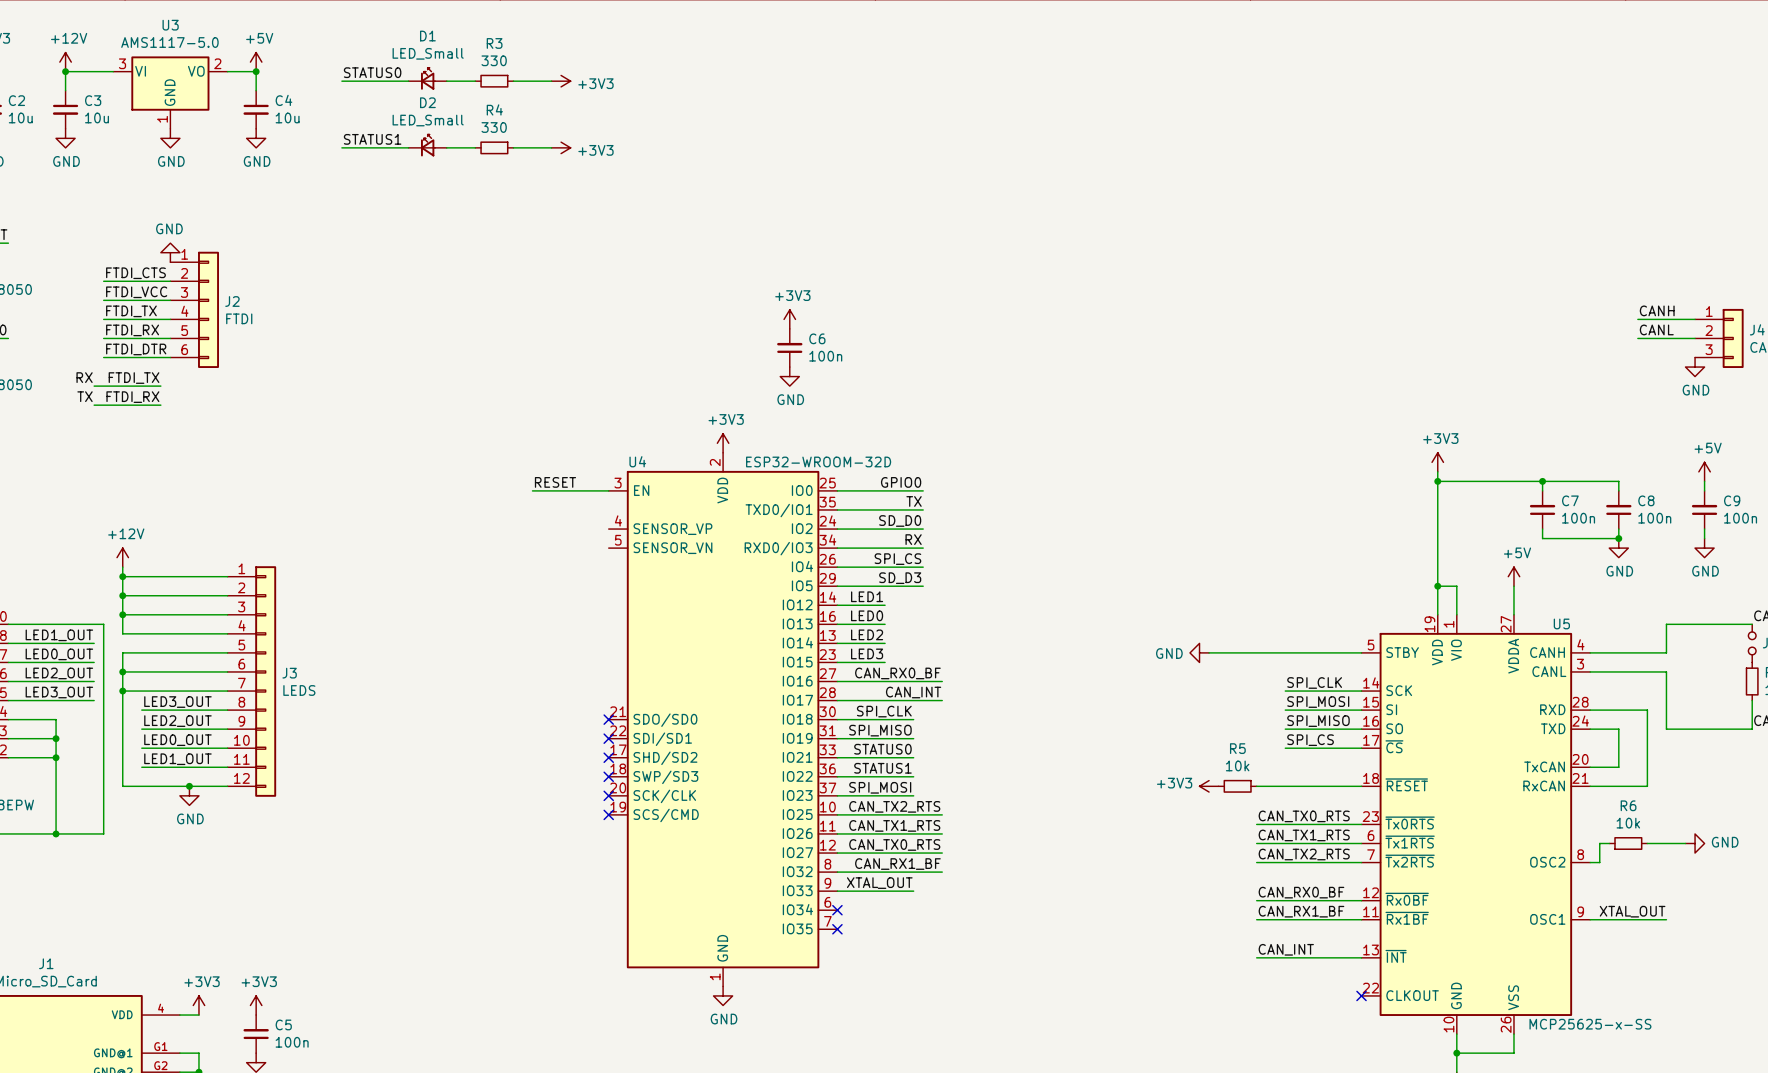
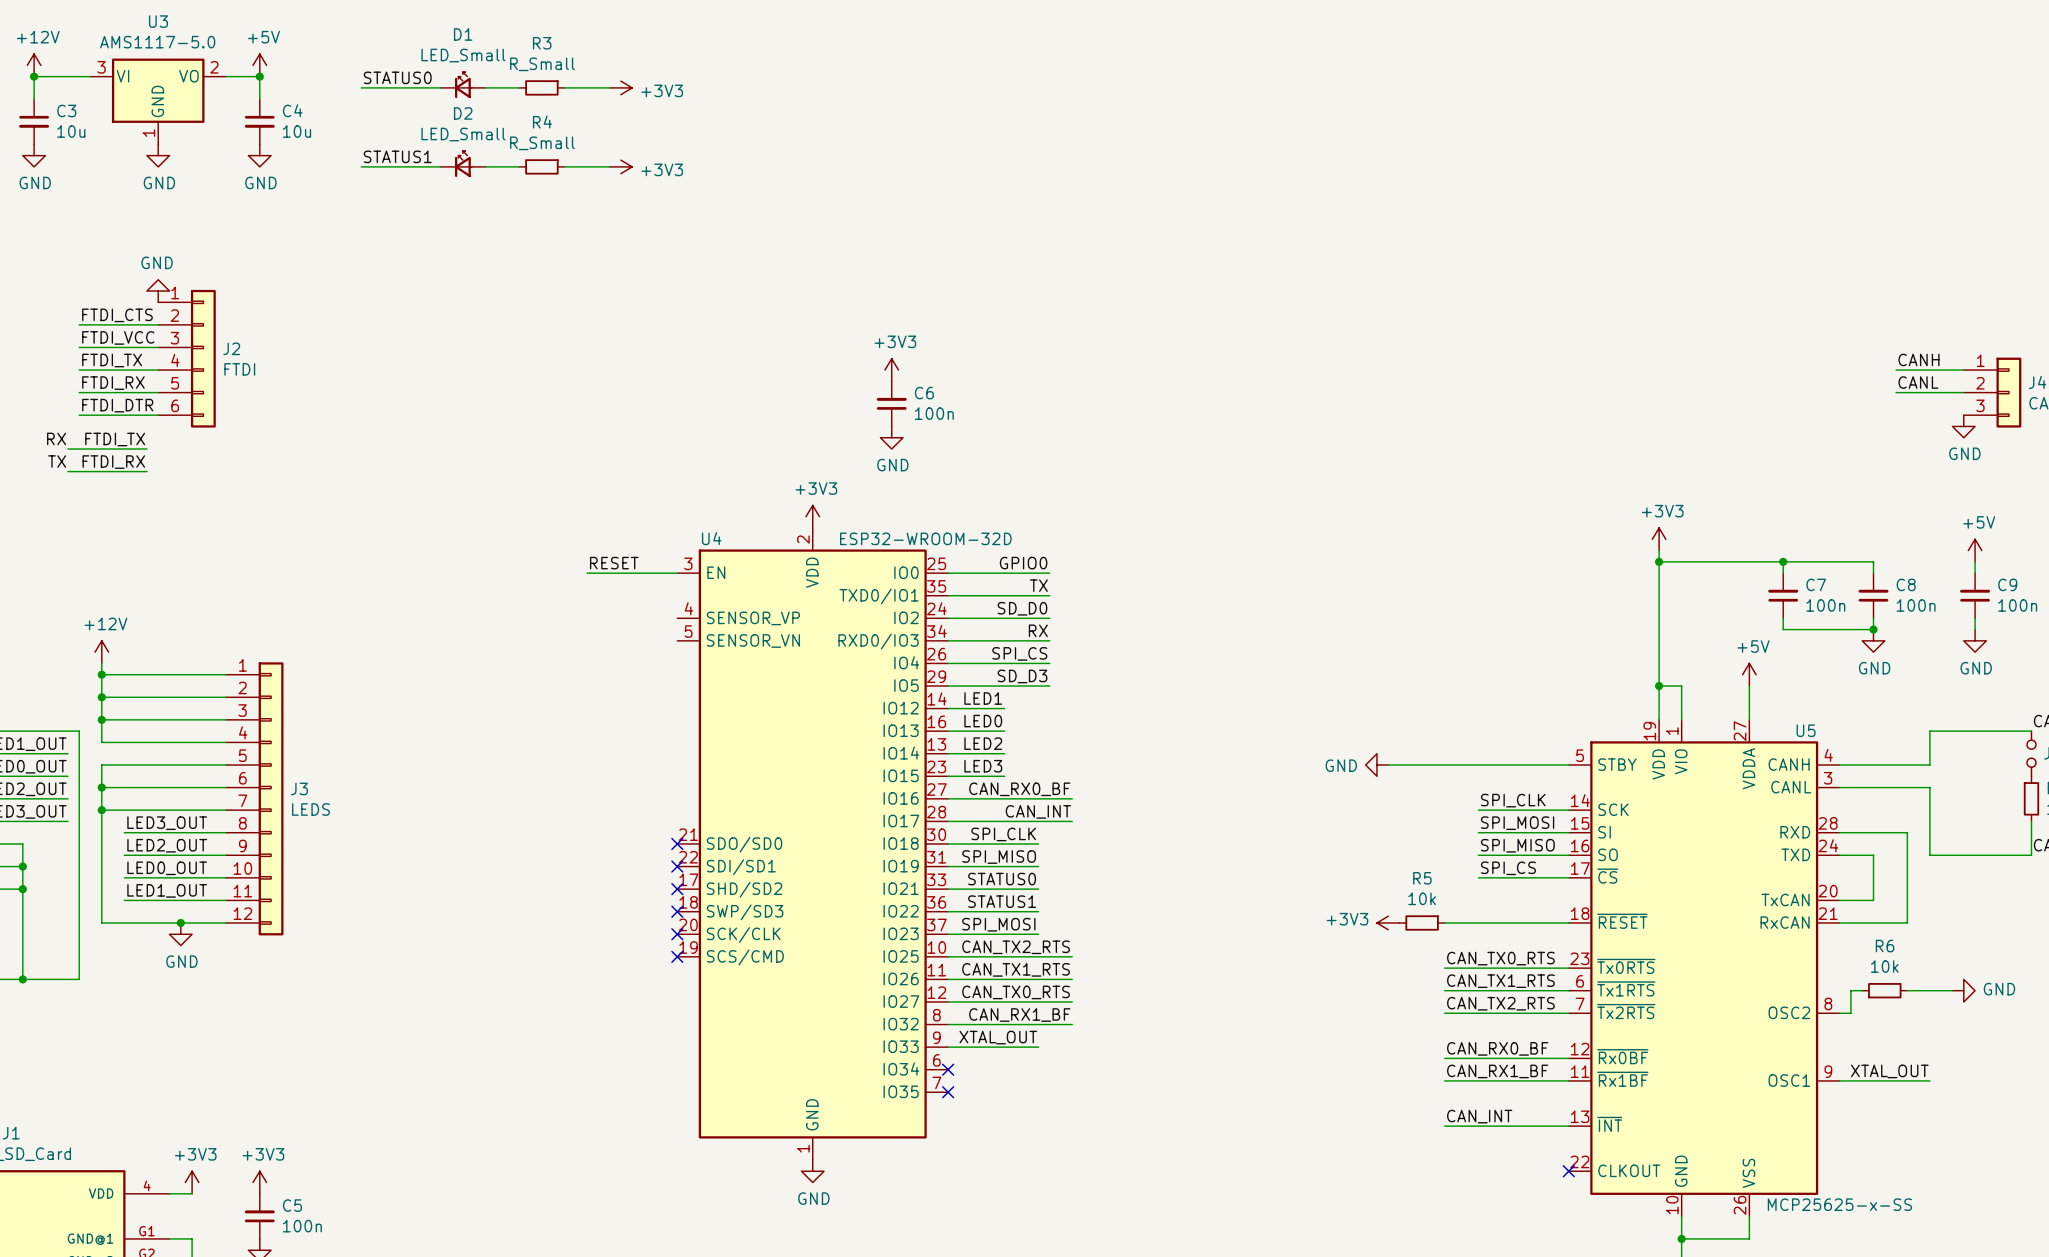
R3 value: 330 (494, 60) -> R_Small (542, 64)
R4 value: 330 (494, 127) -> R_Small (542, 143)

